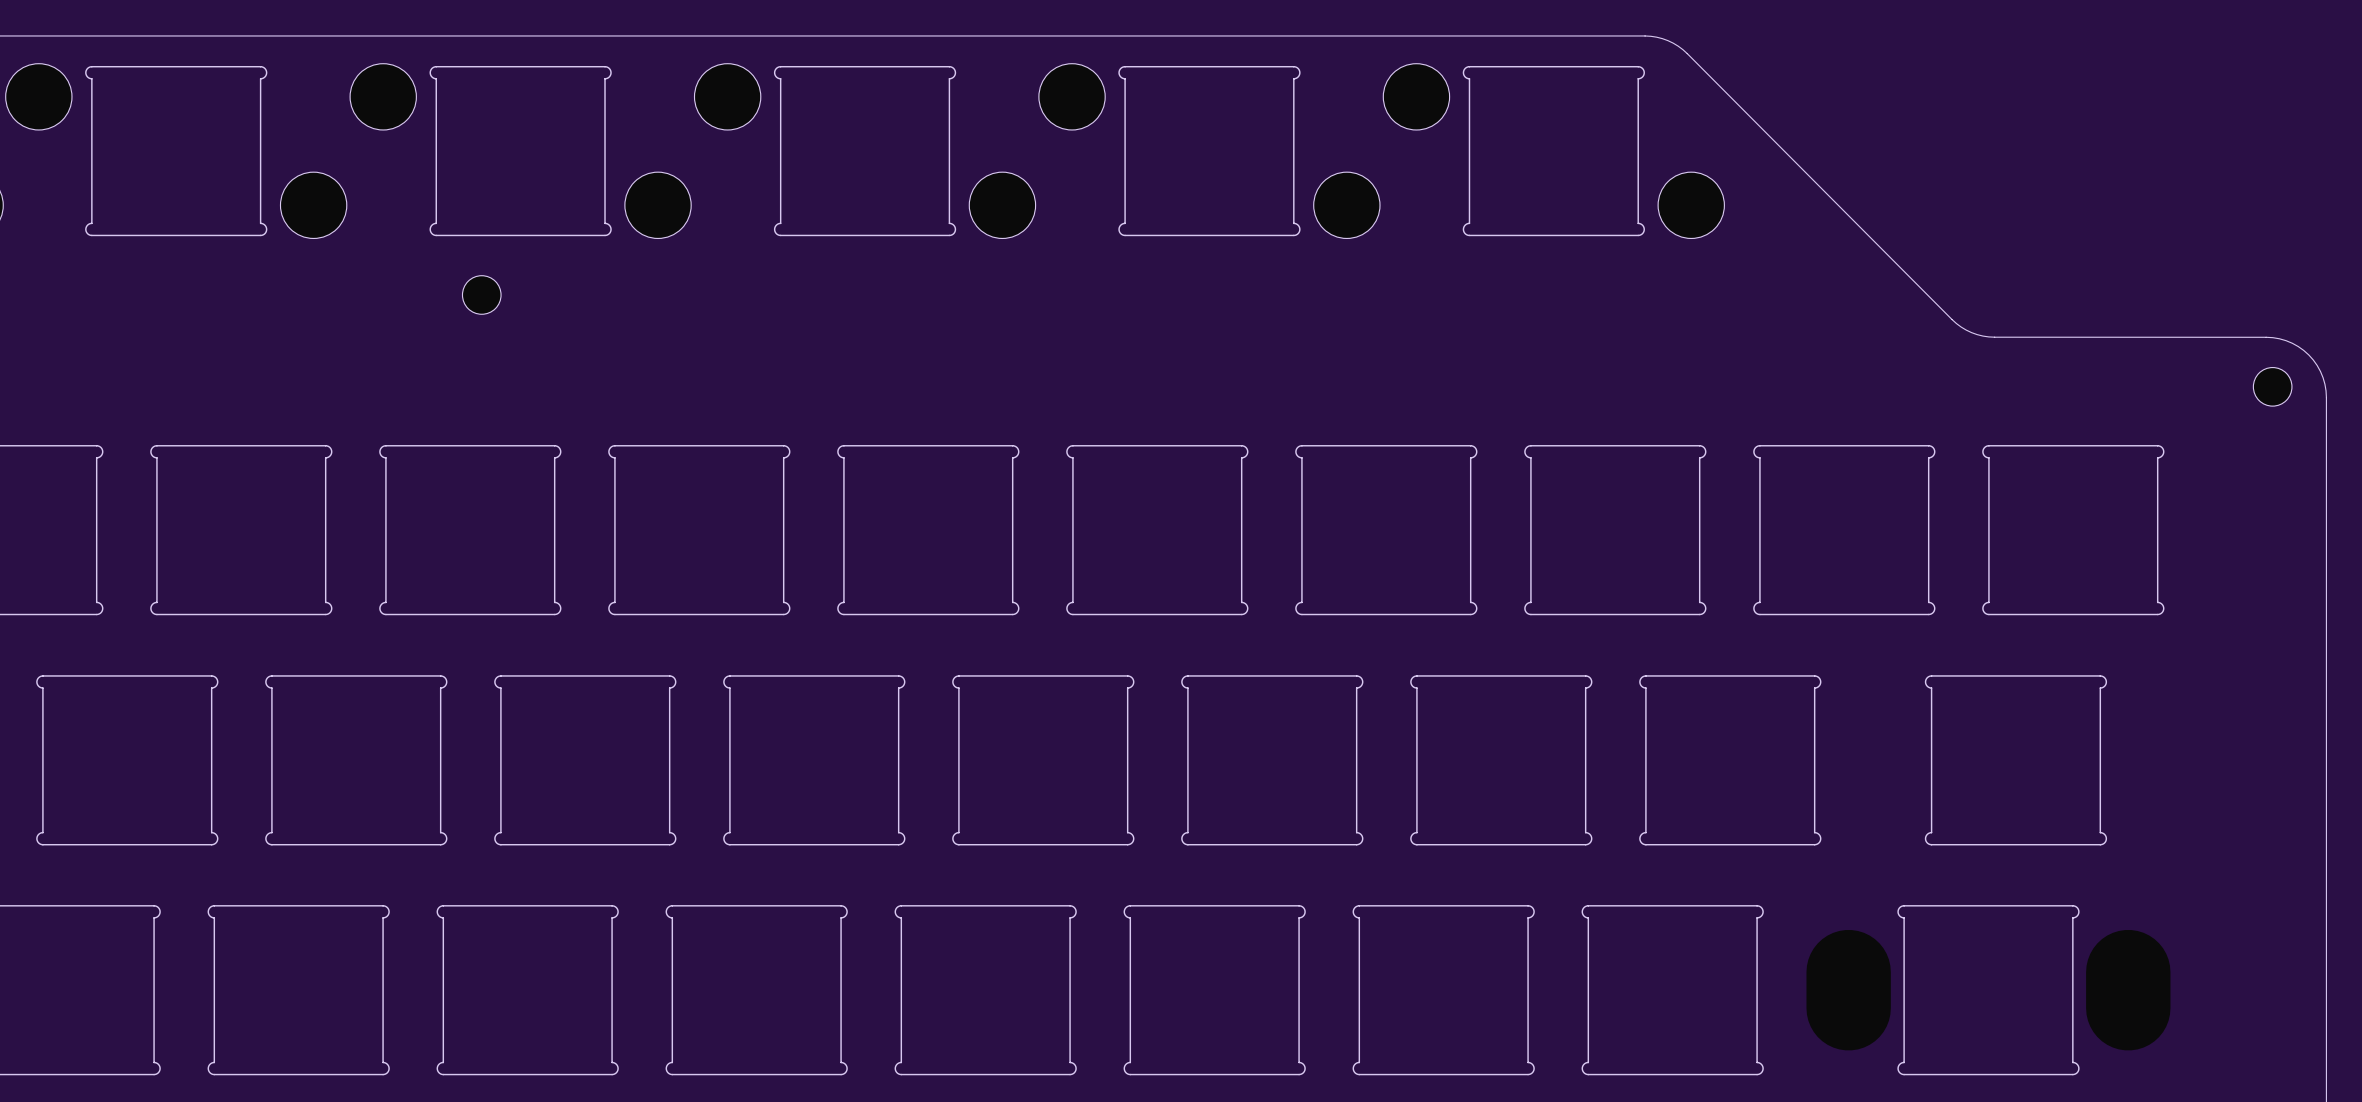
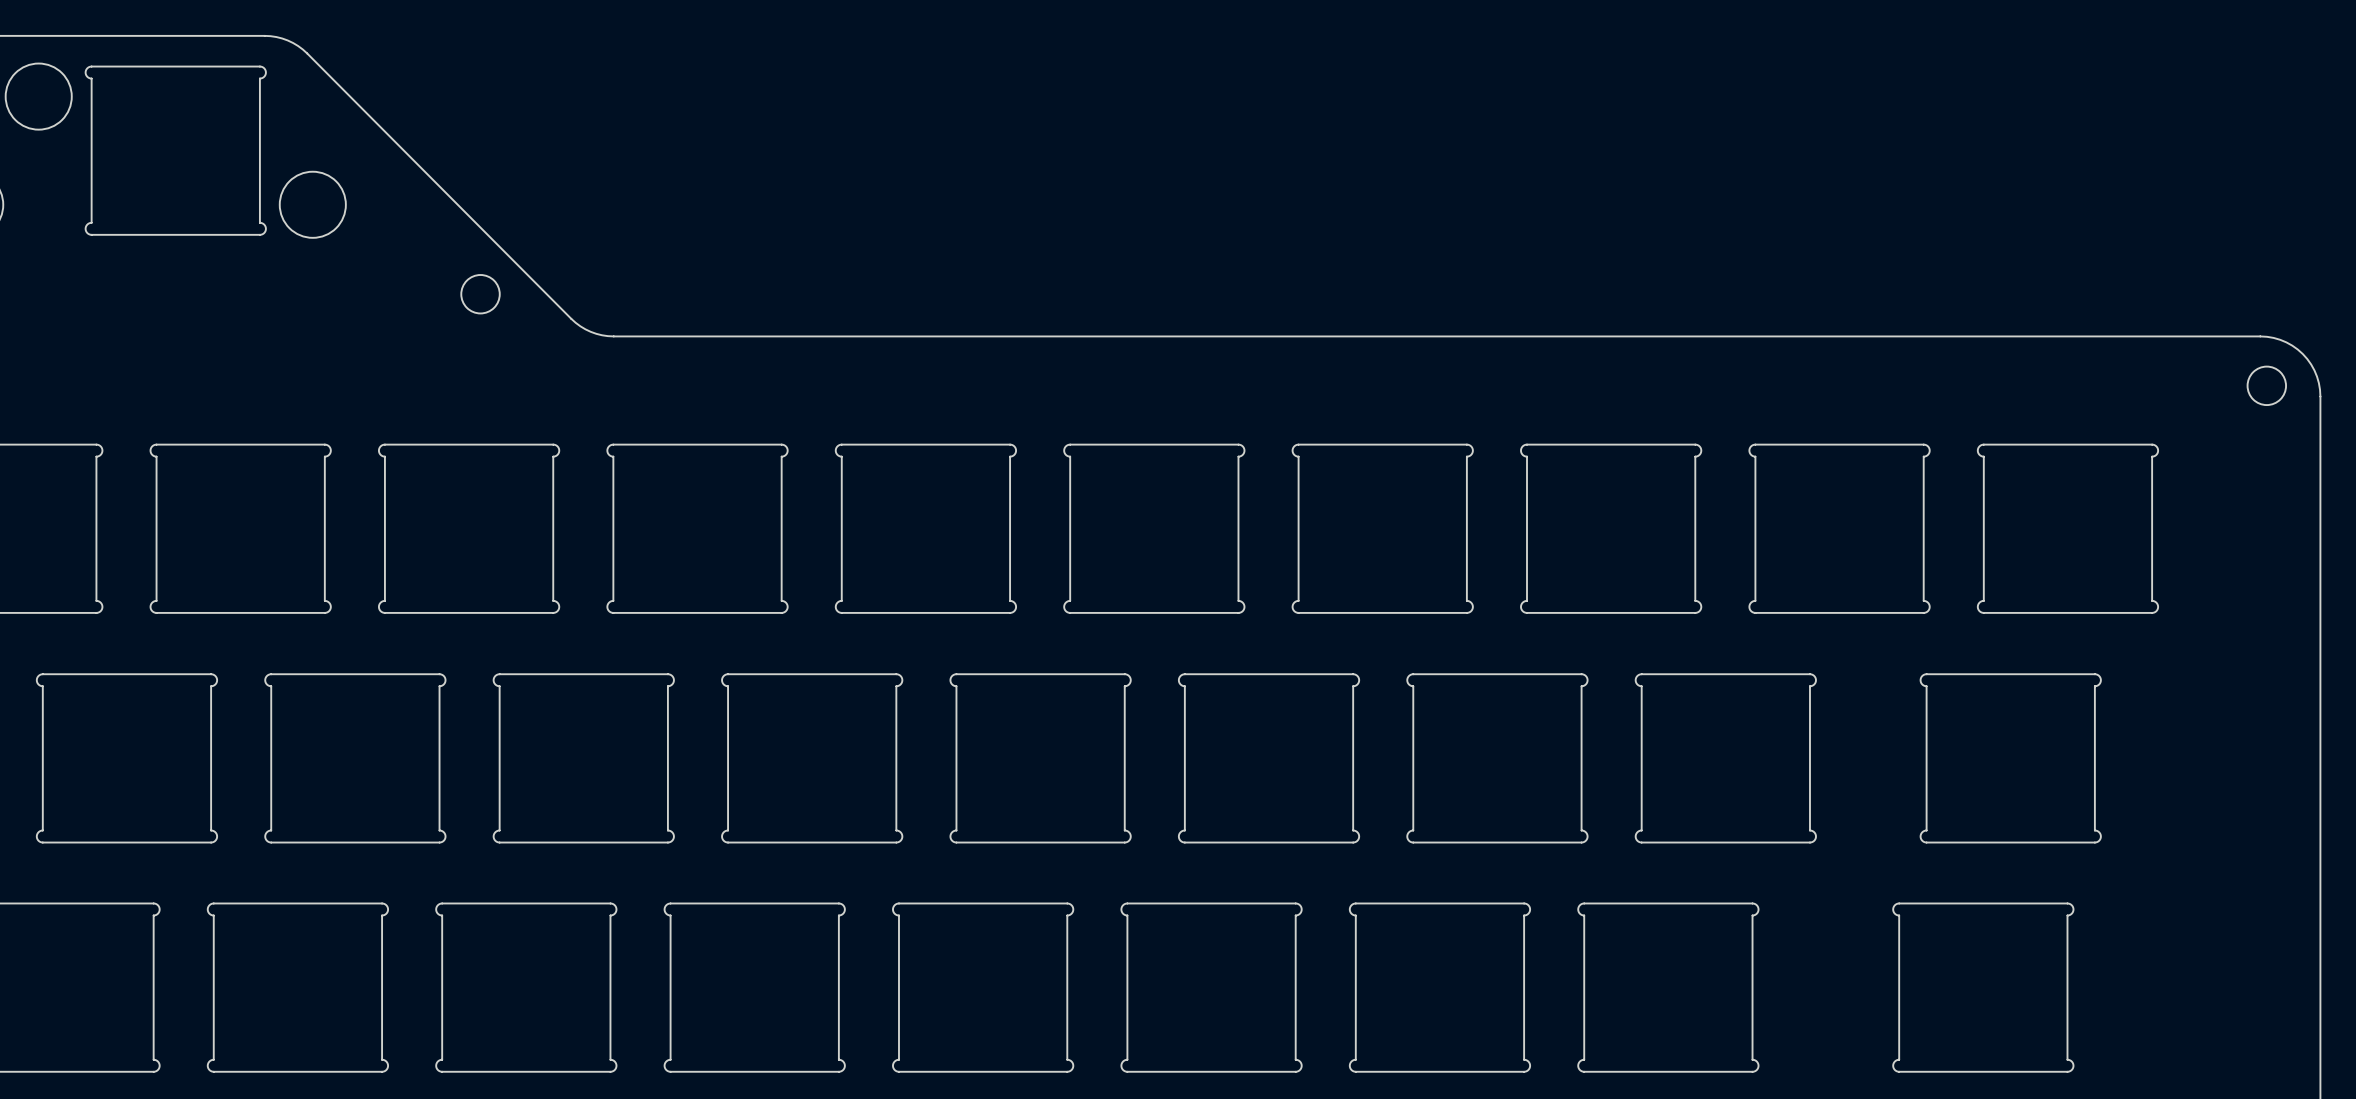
board edge: (265, 35) (1650, 36) (1667, 40) (1687, 53) (1952, 319) (1966, 330) (1982, 336) (1994, 337) (2266, 337) -> (264, 35) (282, 38) (302, 49) (571, 318) (585, 329) (602, 335) (2260, 336)
part: (520, 151) -> none
part: (865, 151) -> none
part: (1209, 151) -> none
part: (1553, 151) -> none

